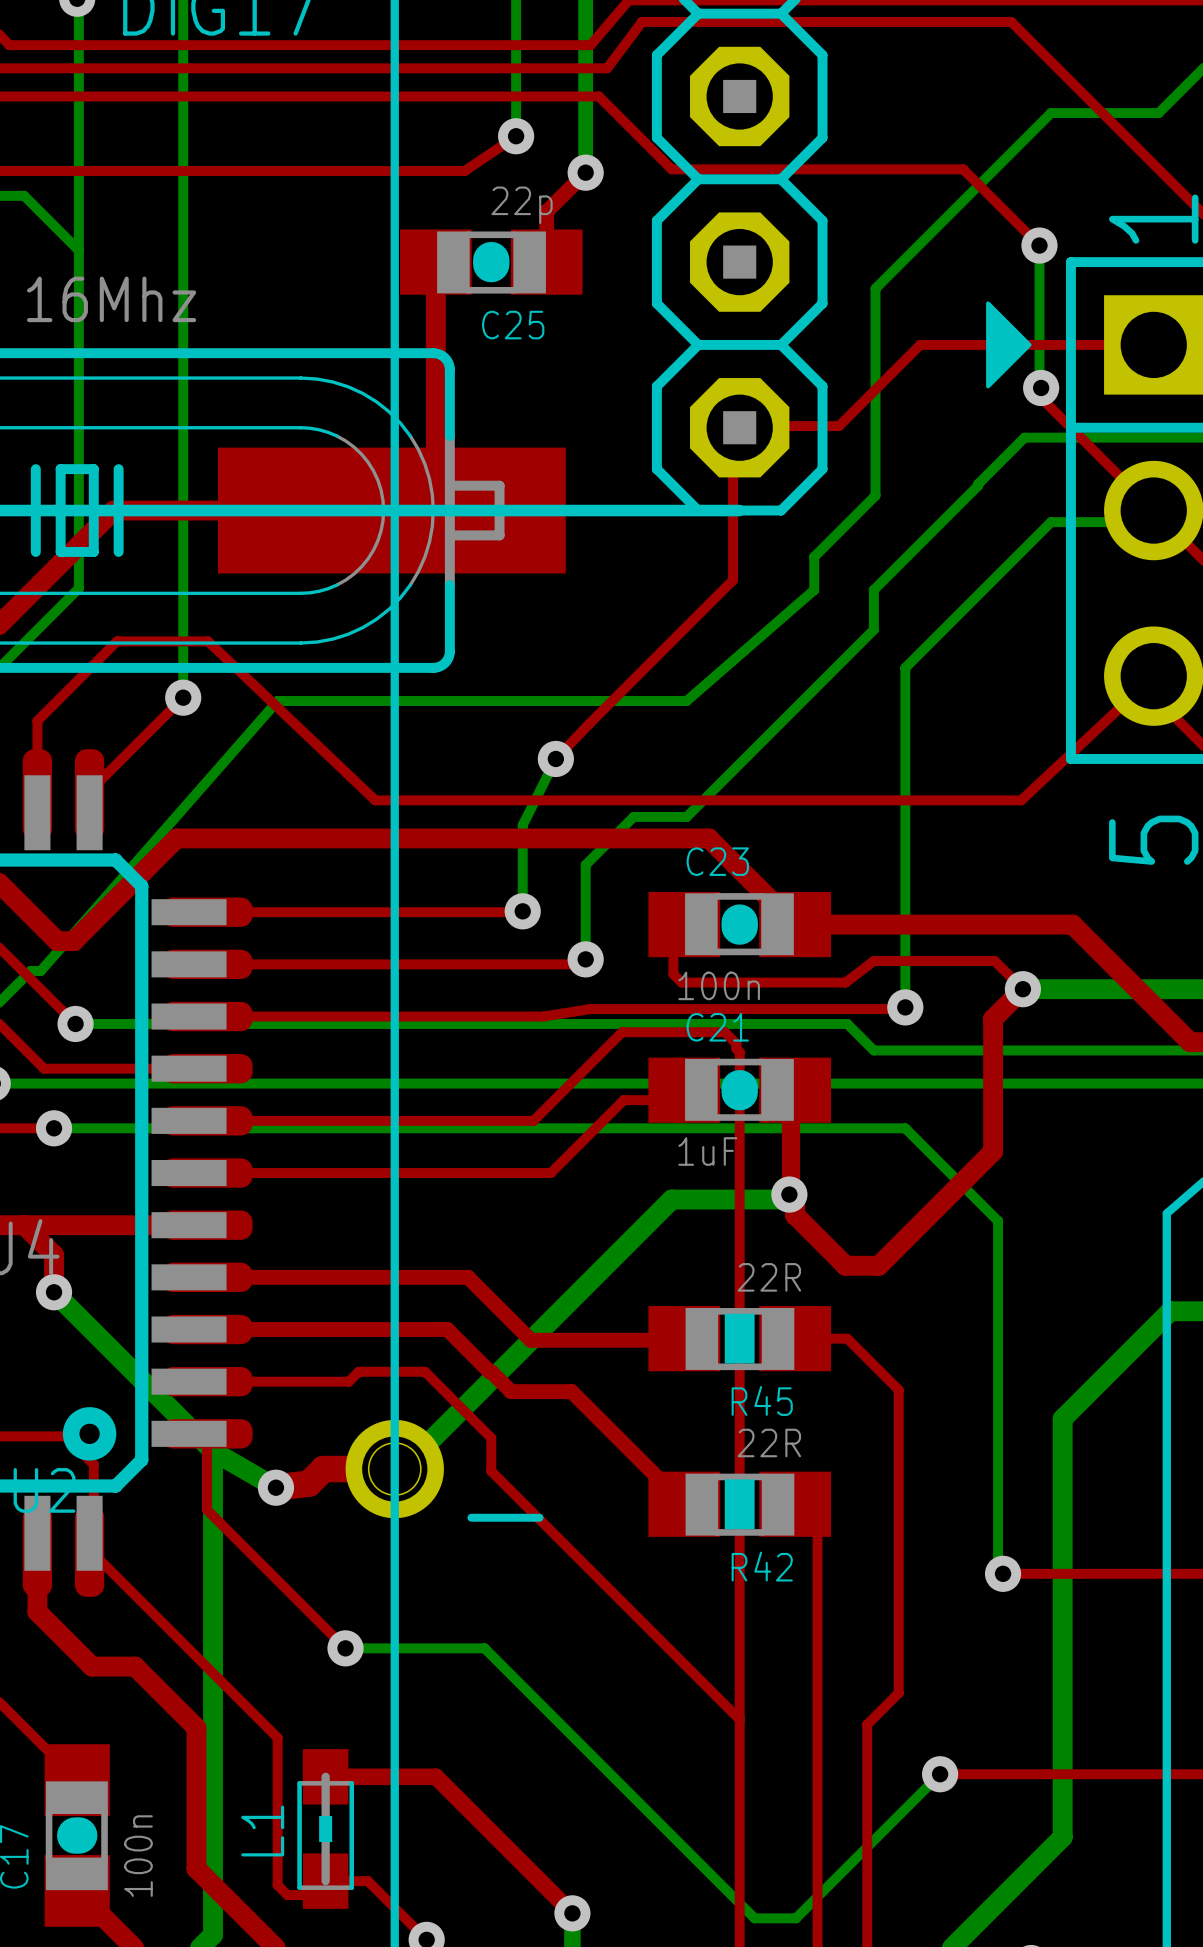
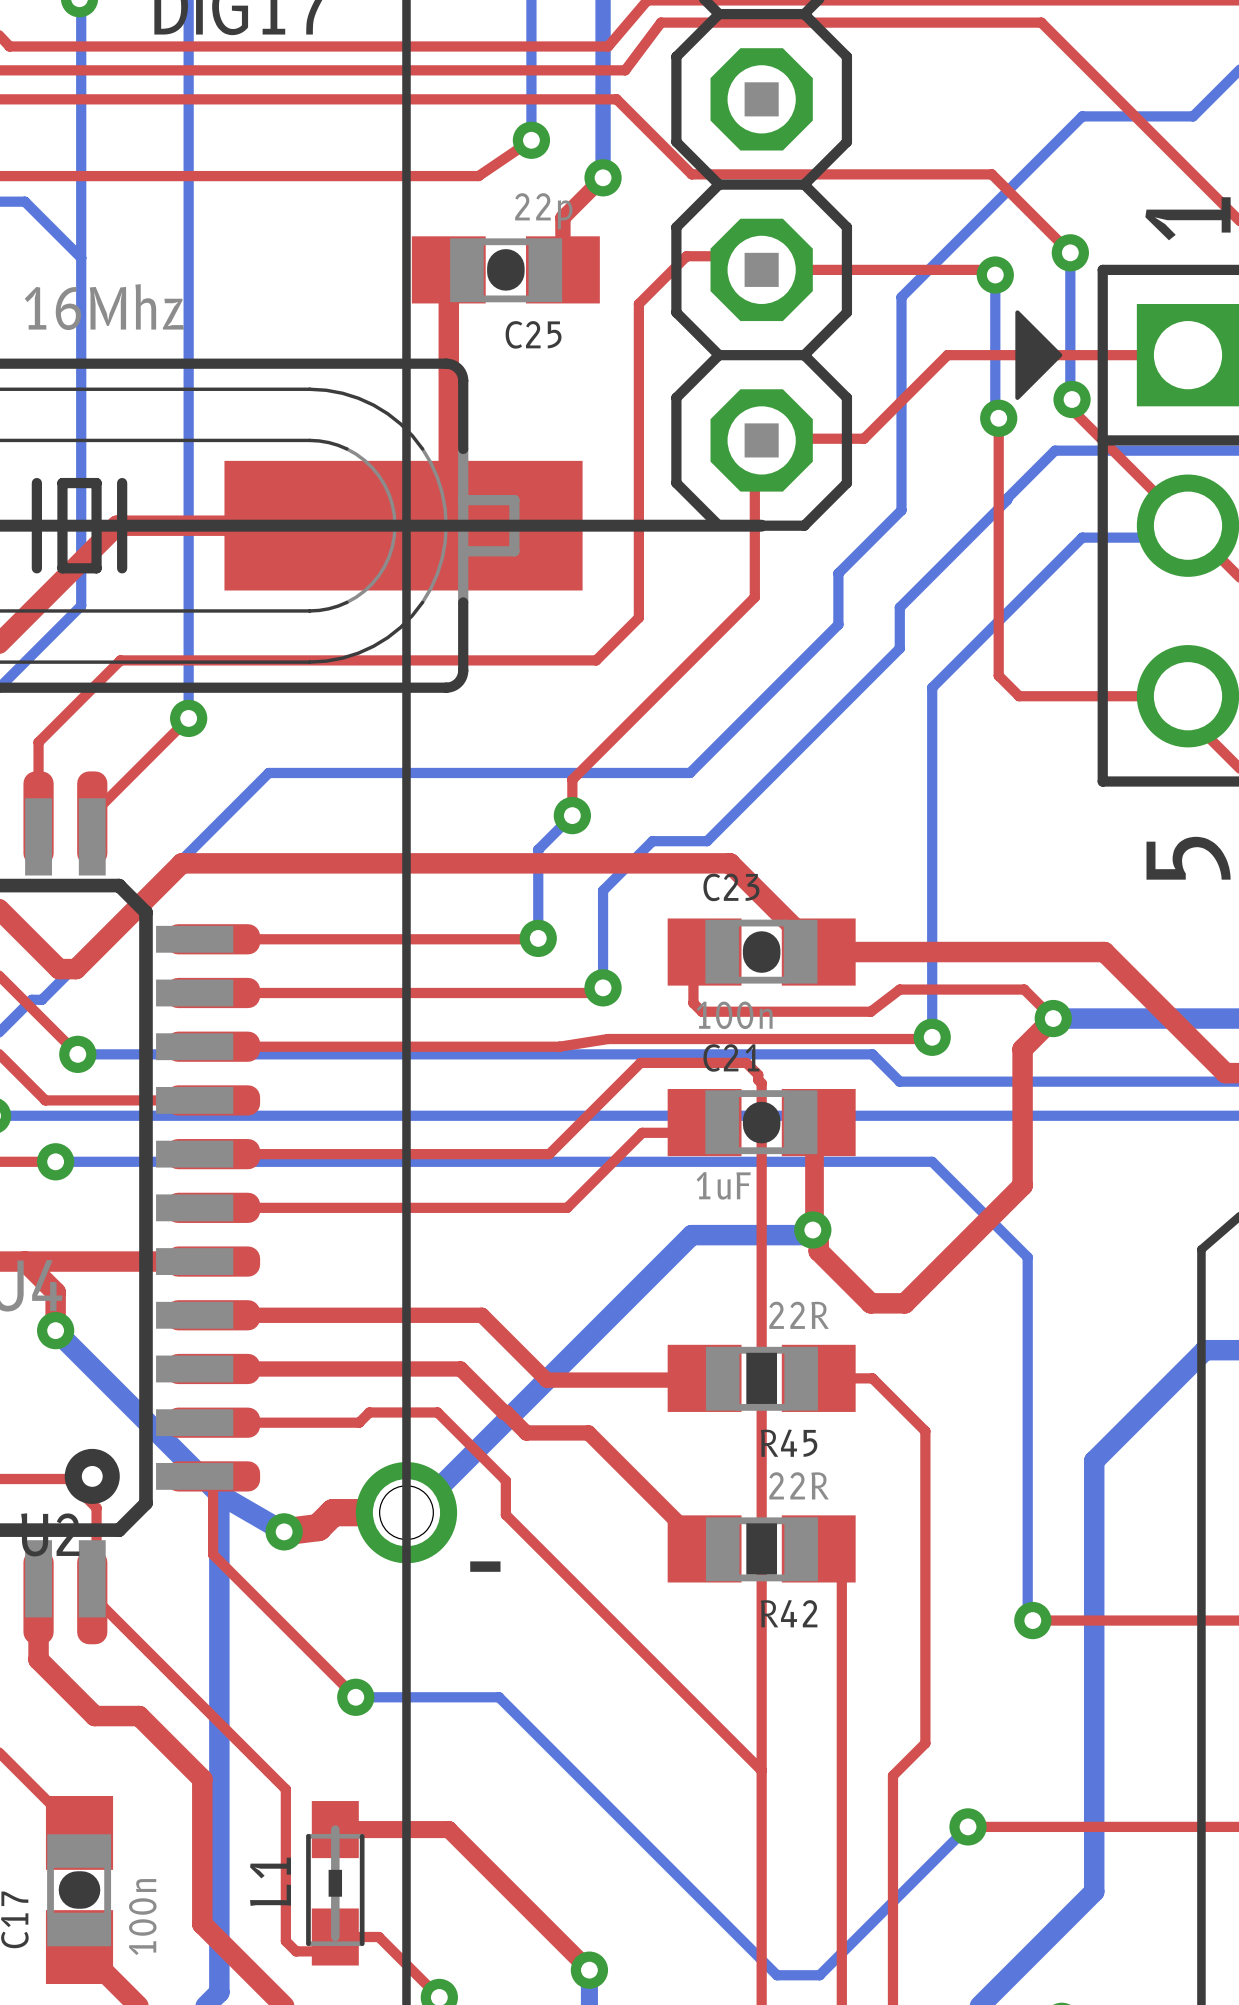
bottom track: none -> (995, 275) (995, 414) (998, 418)
via: none -> (995, 275)
top track: none -> (998, 418) (998, 675) (1019, 696) (1188, 696)
via: none -> (998, 418)
bottom track: (814, 590) (686, 701) (277, 701) (40, 970) -> (838, 607) (838, 624) (690, 772) (268, 772) (41, 999)
top track: (208, 641) (375, 800) (1021, 800) (1153, 676) -> (214, 660) (596, 660) (638, 617) (638, 303) (686, 256) (748, 256) (761, 269) (990, 269) (995, 275)
top track: (588, 724) (555, 758) -> (606, 745) (572, 779) (572, 815)
bottom track: (555, 758) (522, 825) -> (572, 815) (538, 849)
via position: (555, 758) -> (572, 815)

